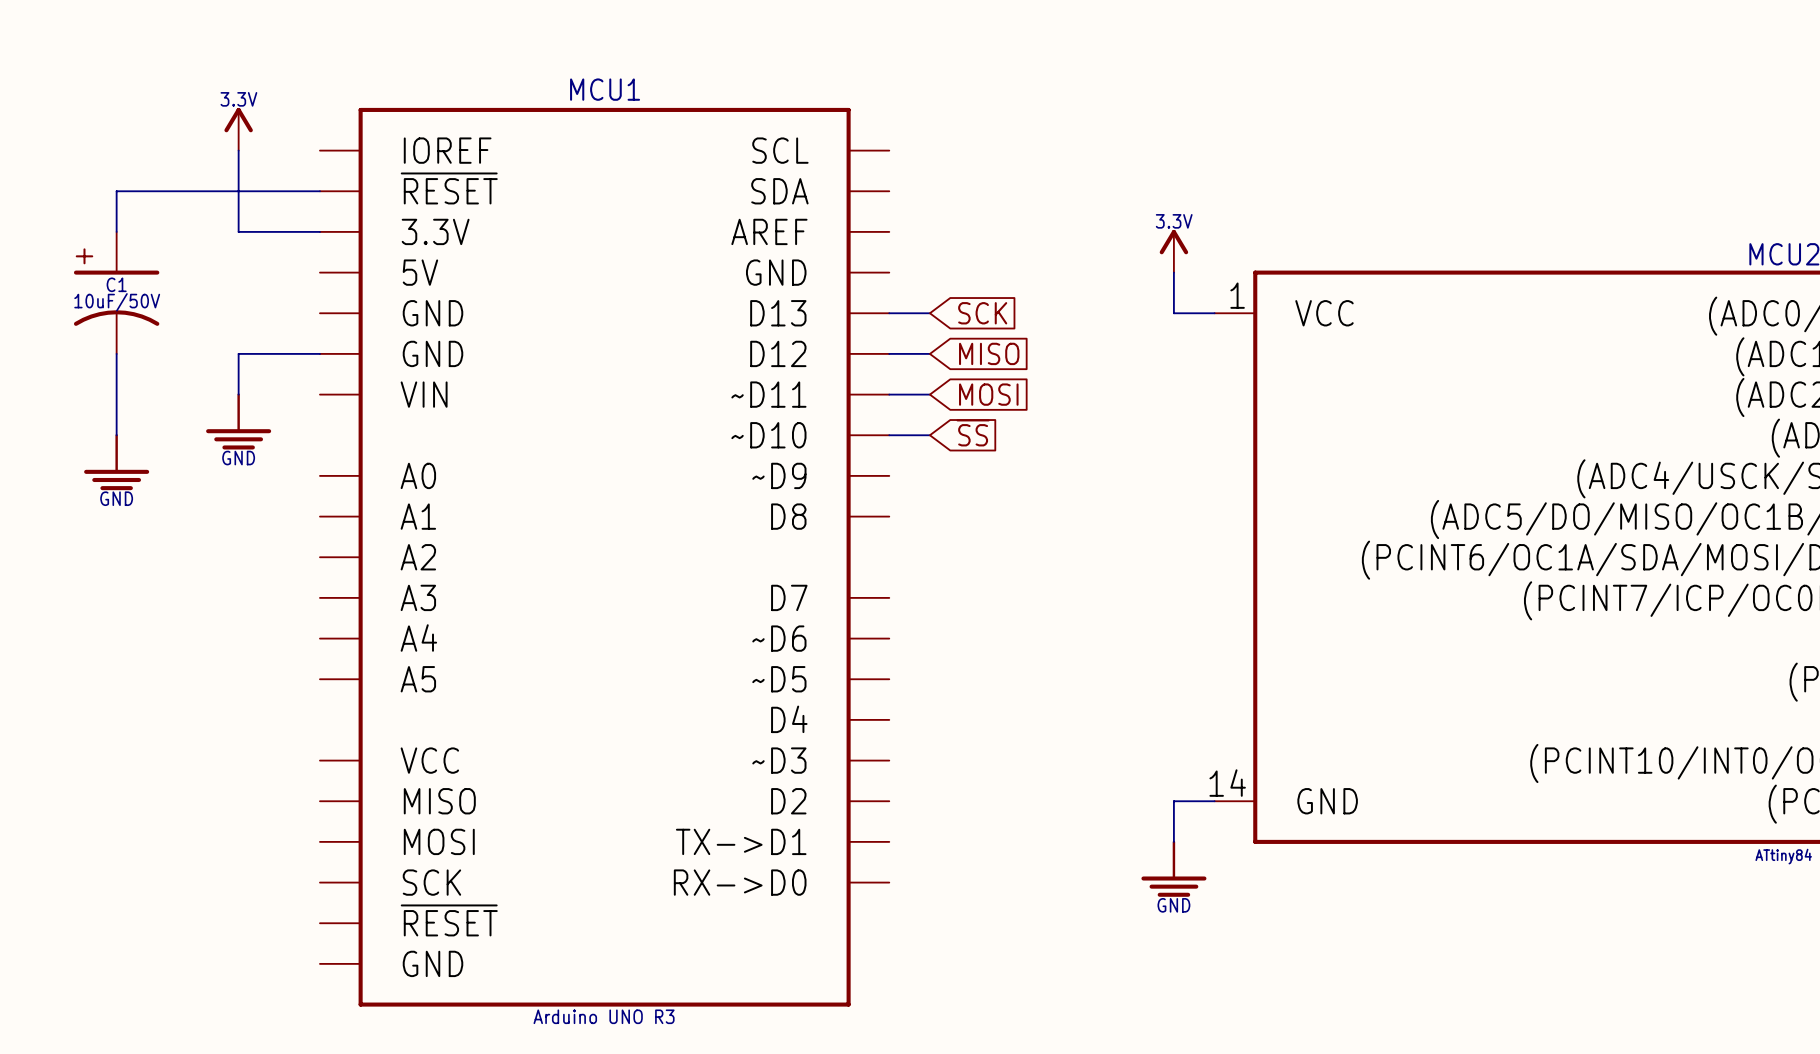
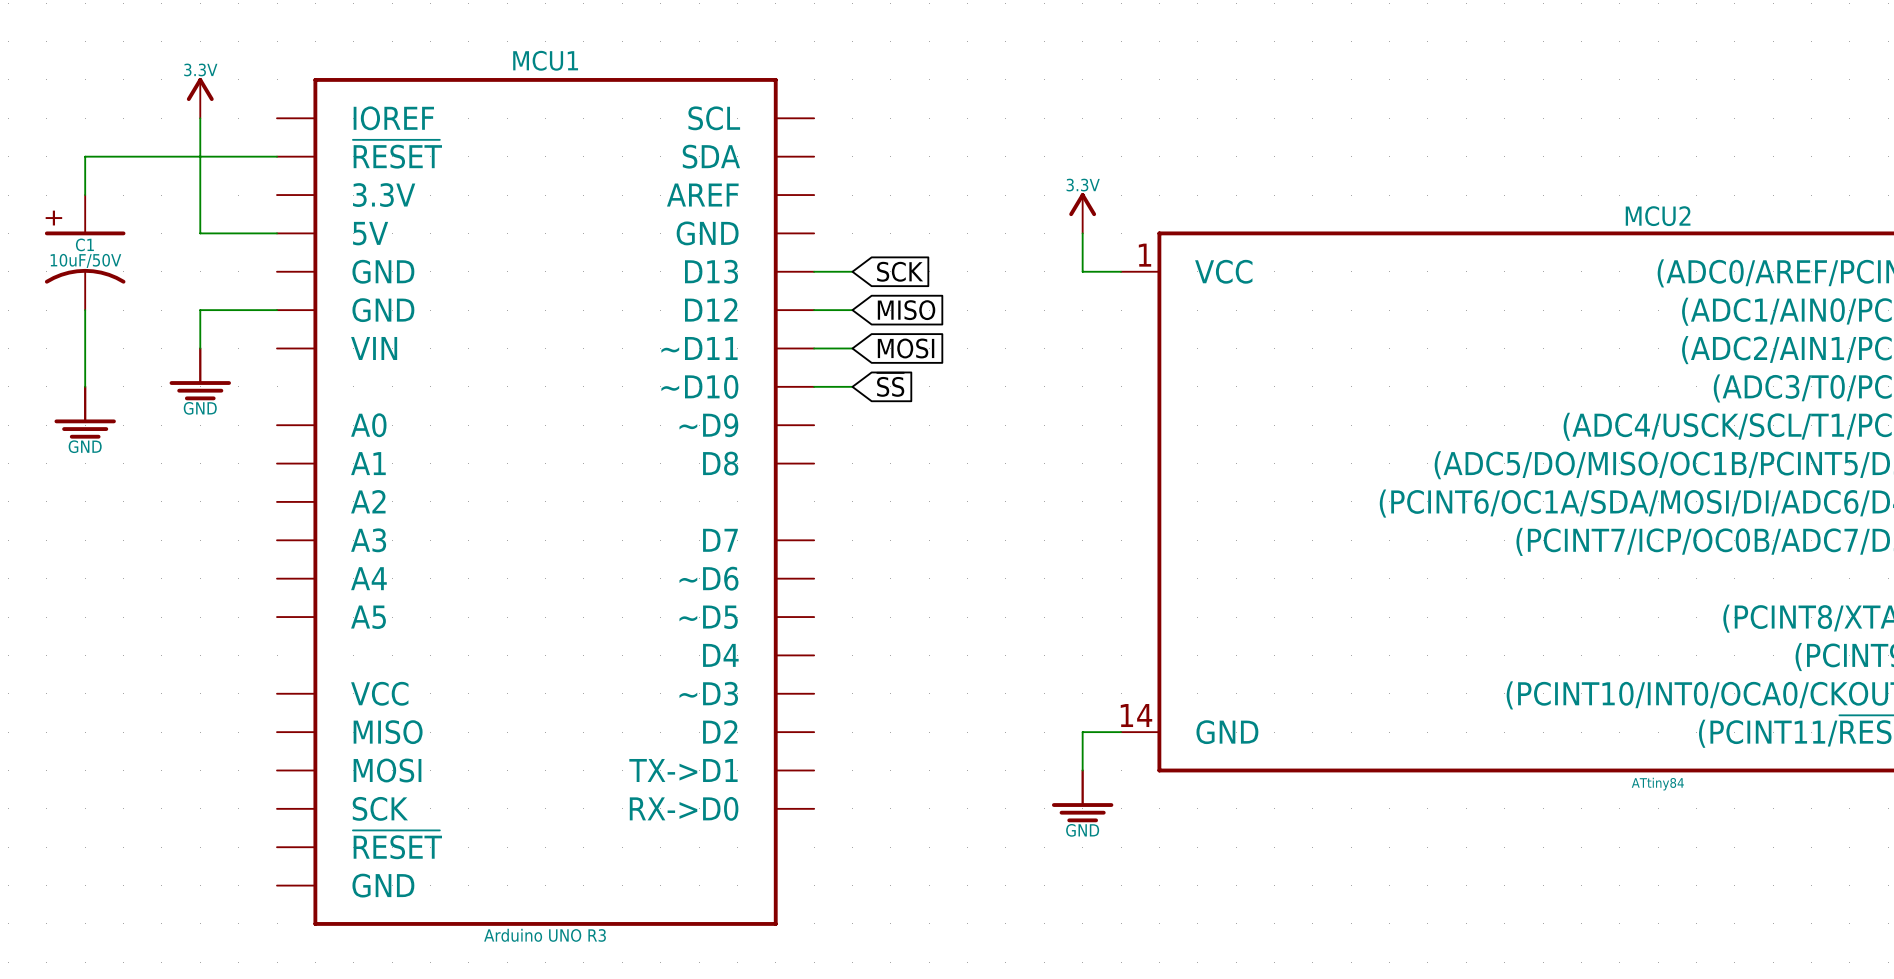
wire: (238, 231) (319, 231) -> (200, 195) (200, 233) (277, 233)

